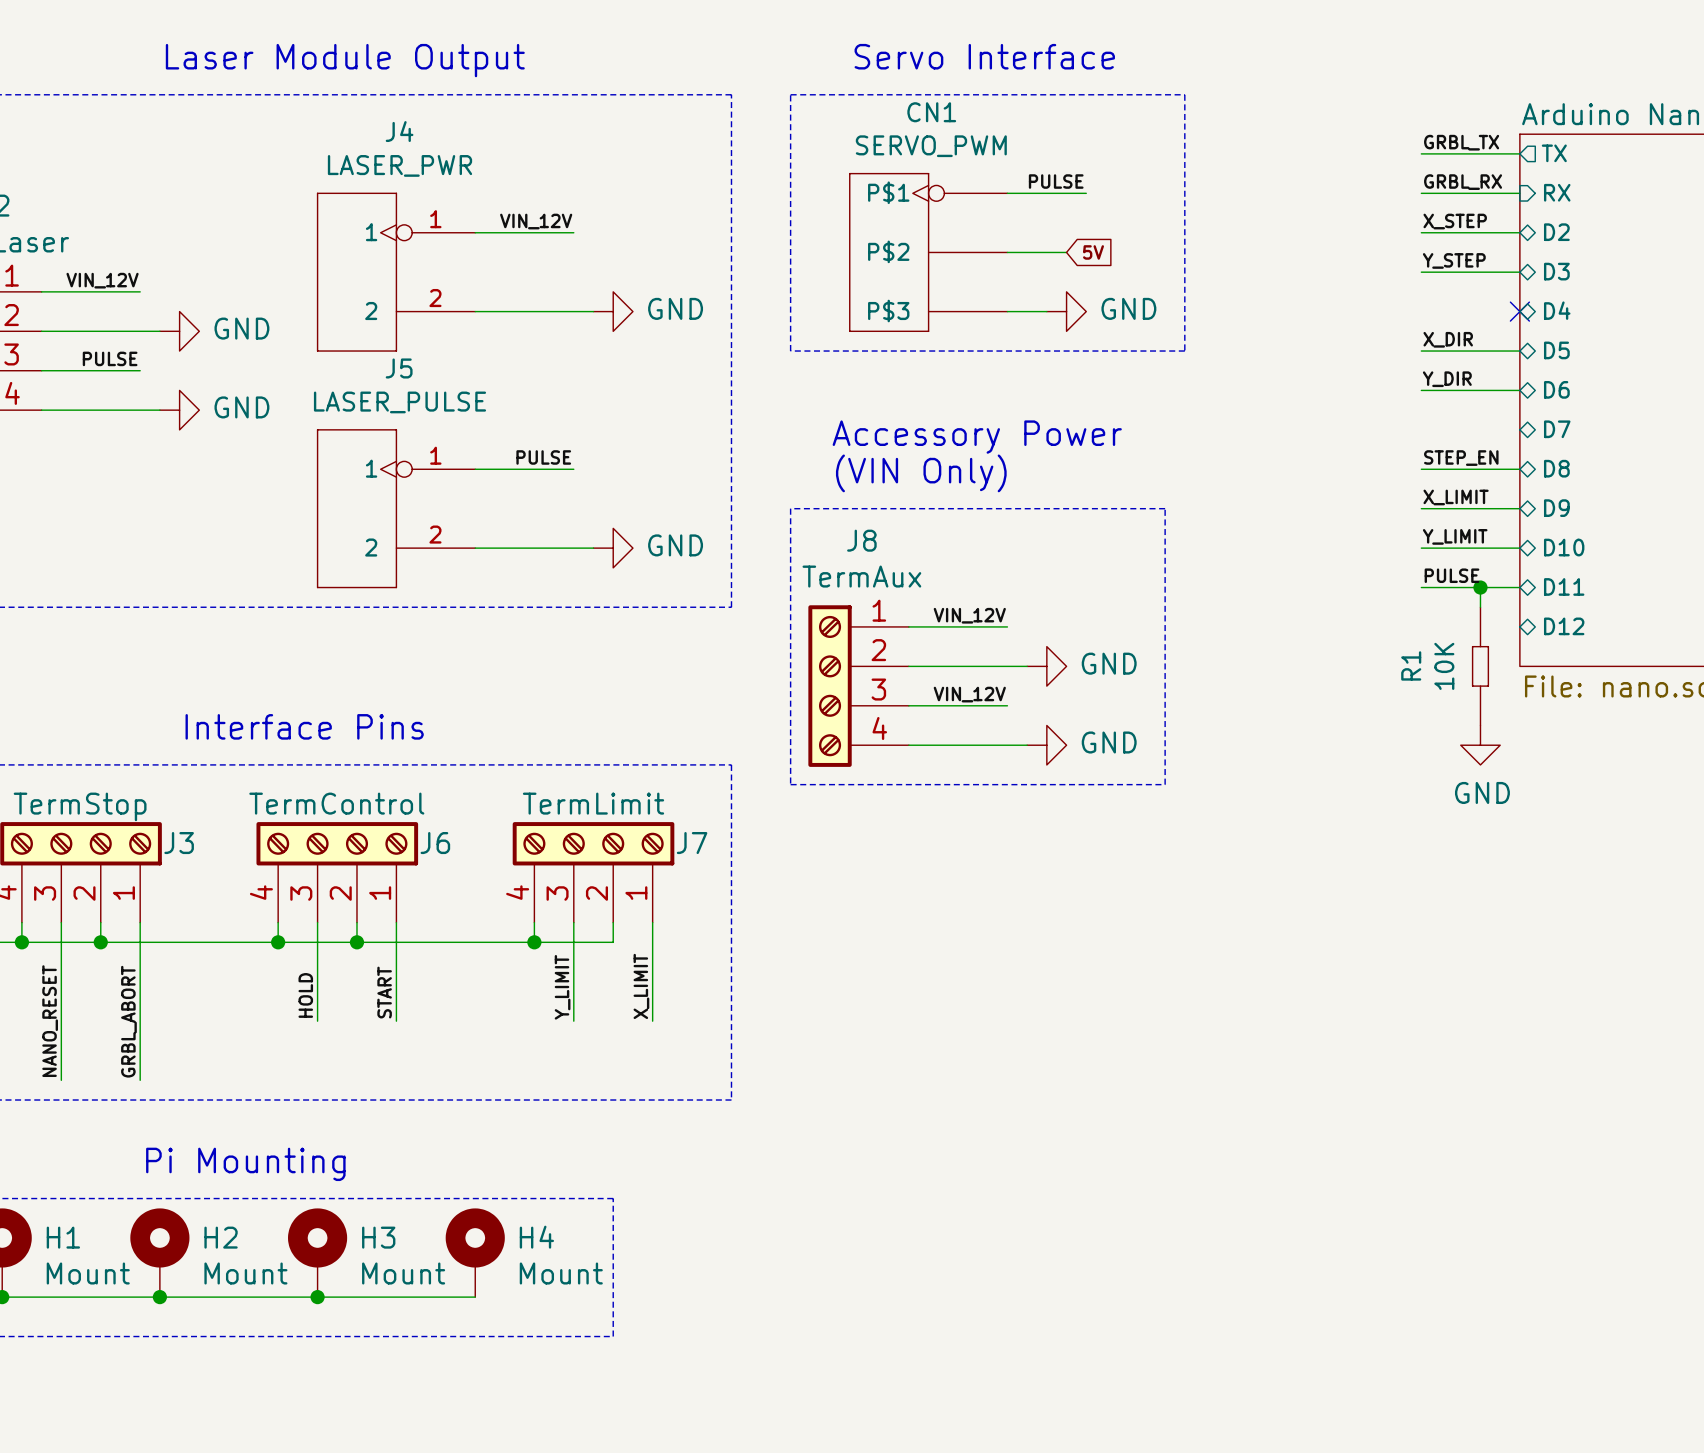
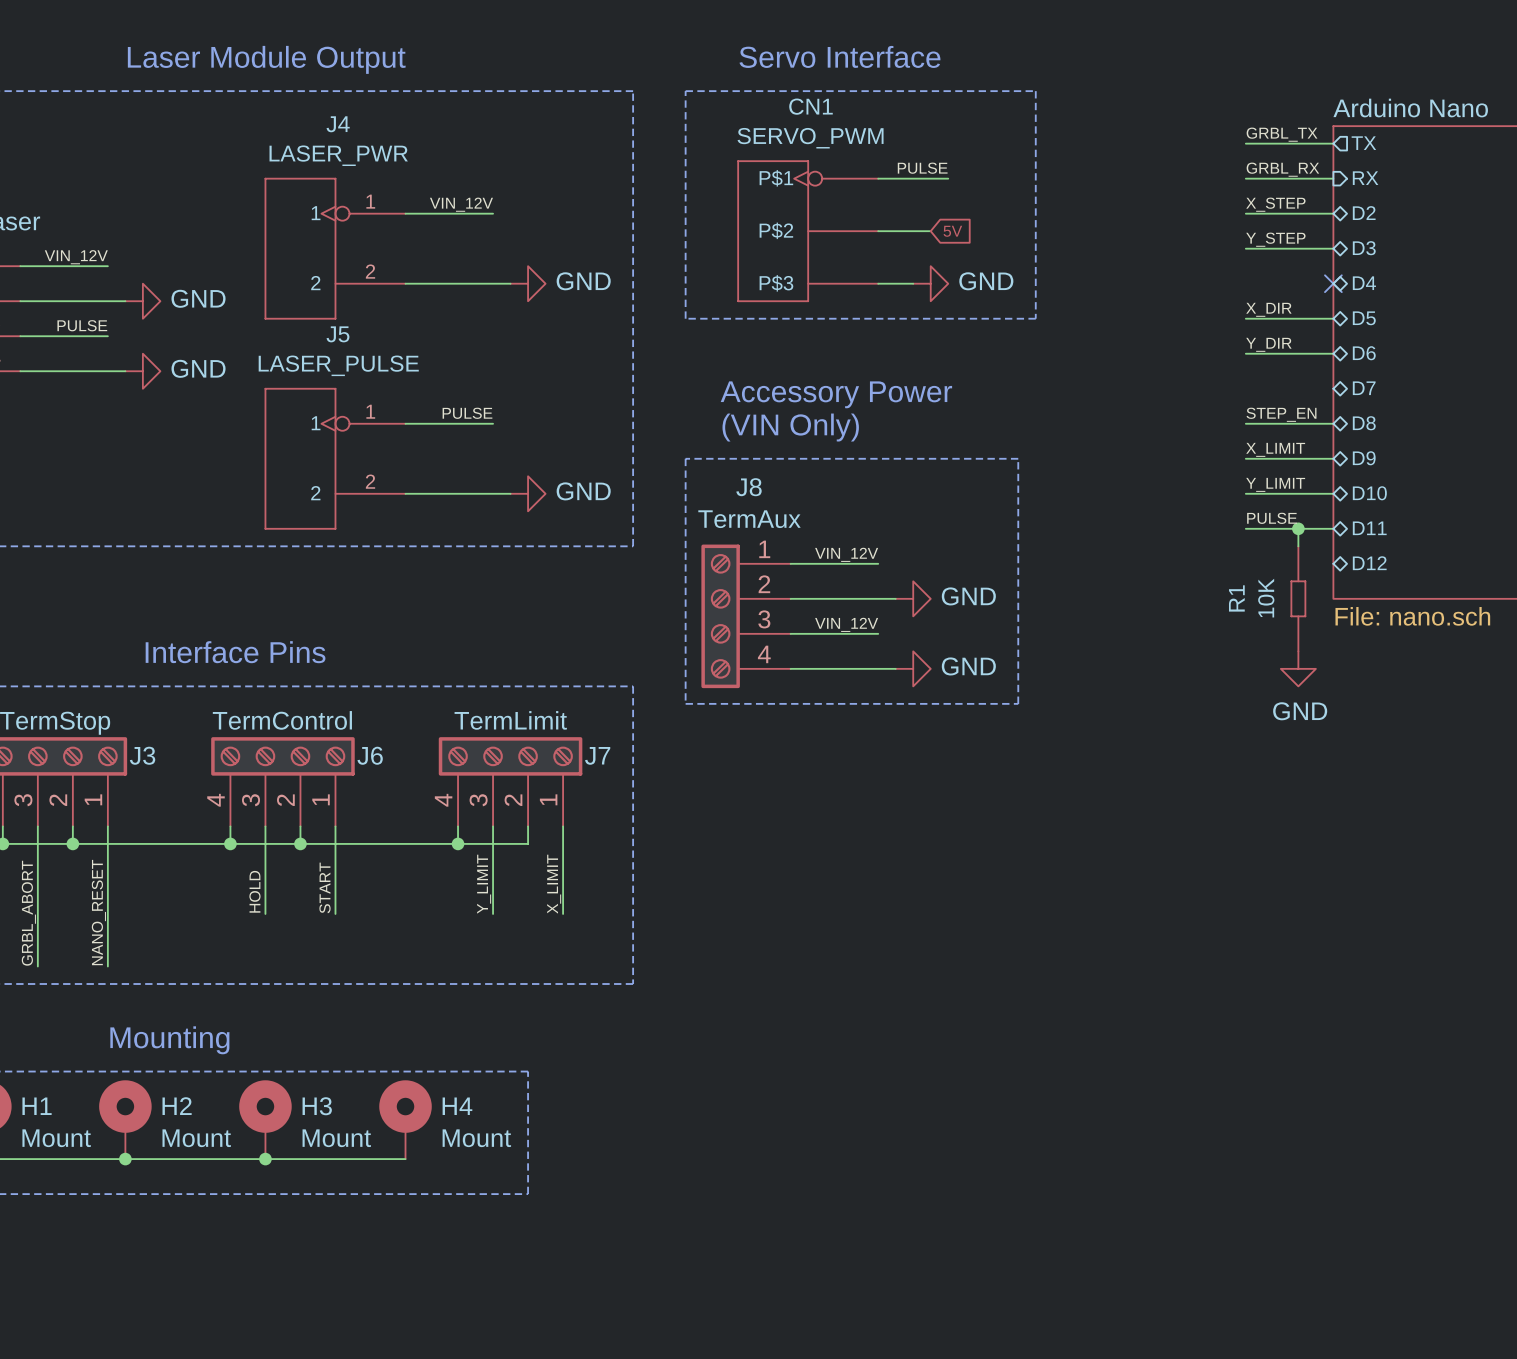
label: NANO_RESET (50, 1021) -> GRBL_ABORT (28, 913)
label: GRBL_ABORT (128, 1021) -> NANO_RESET (98, 912)
text: Pi Mounting (245, 1164) -> Mounting (169, 1040)

